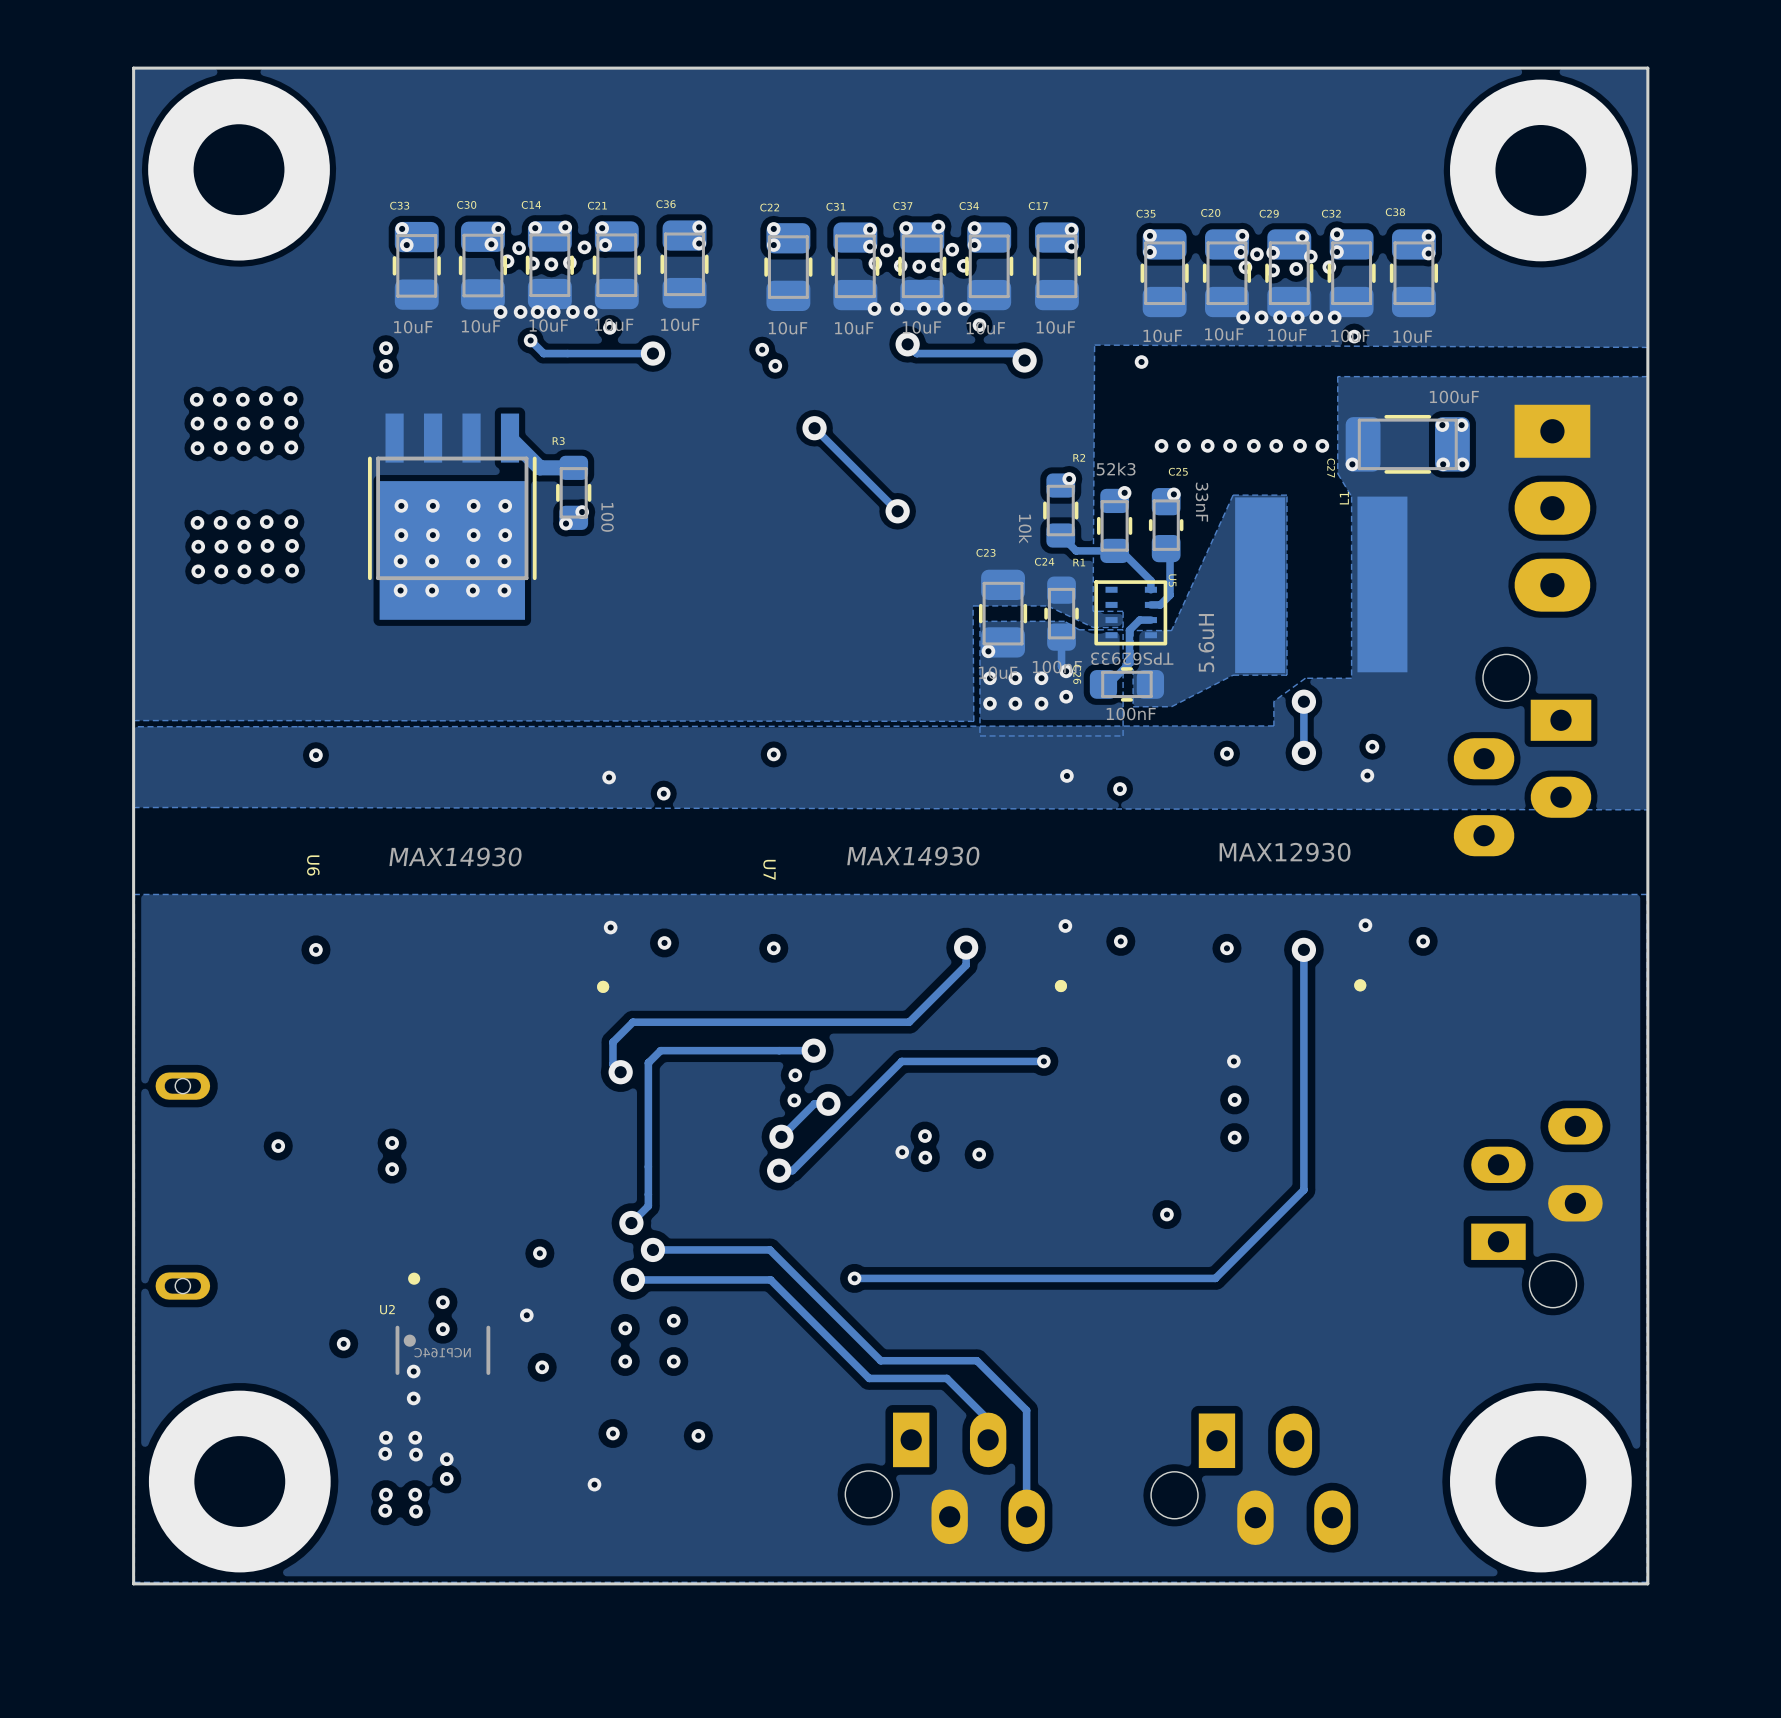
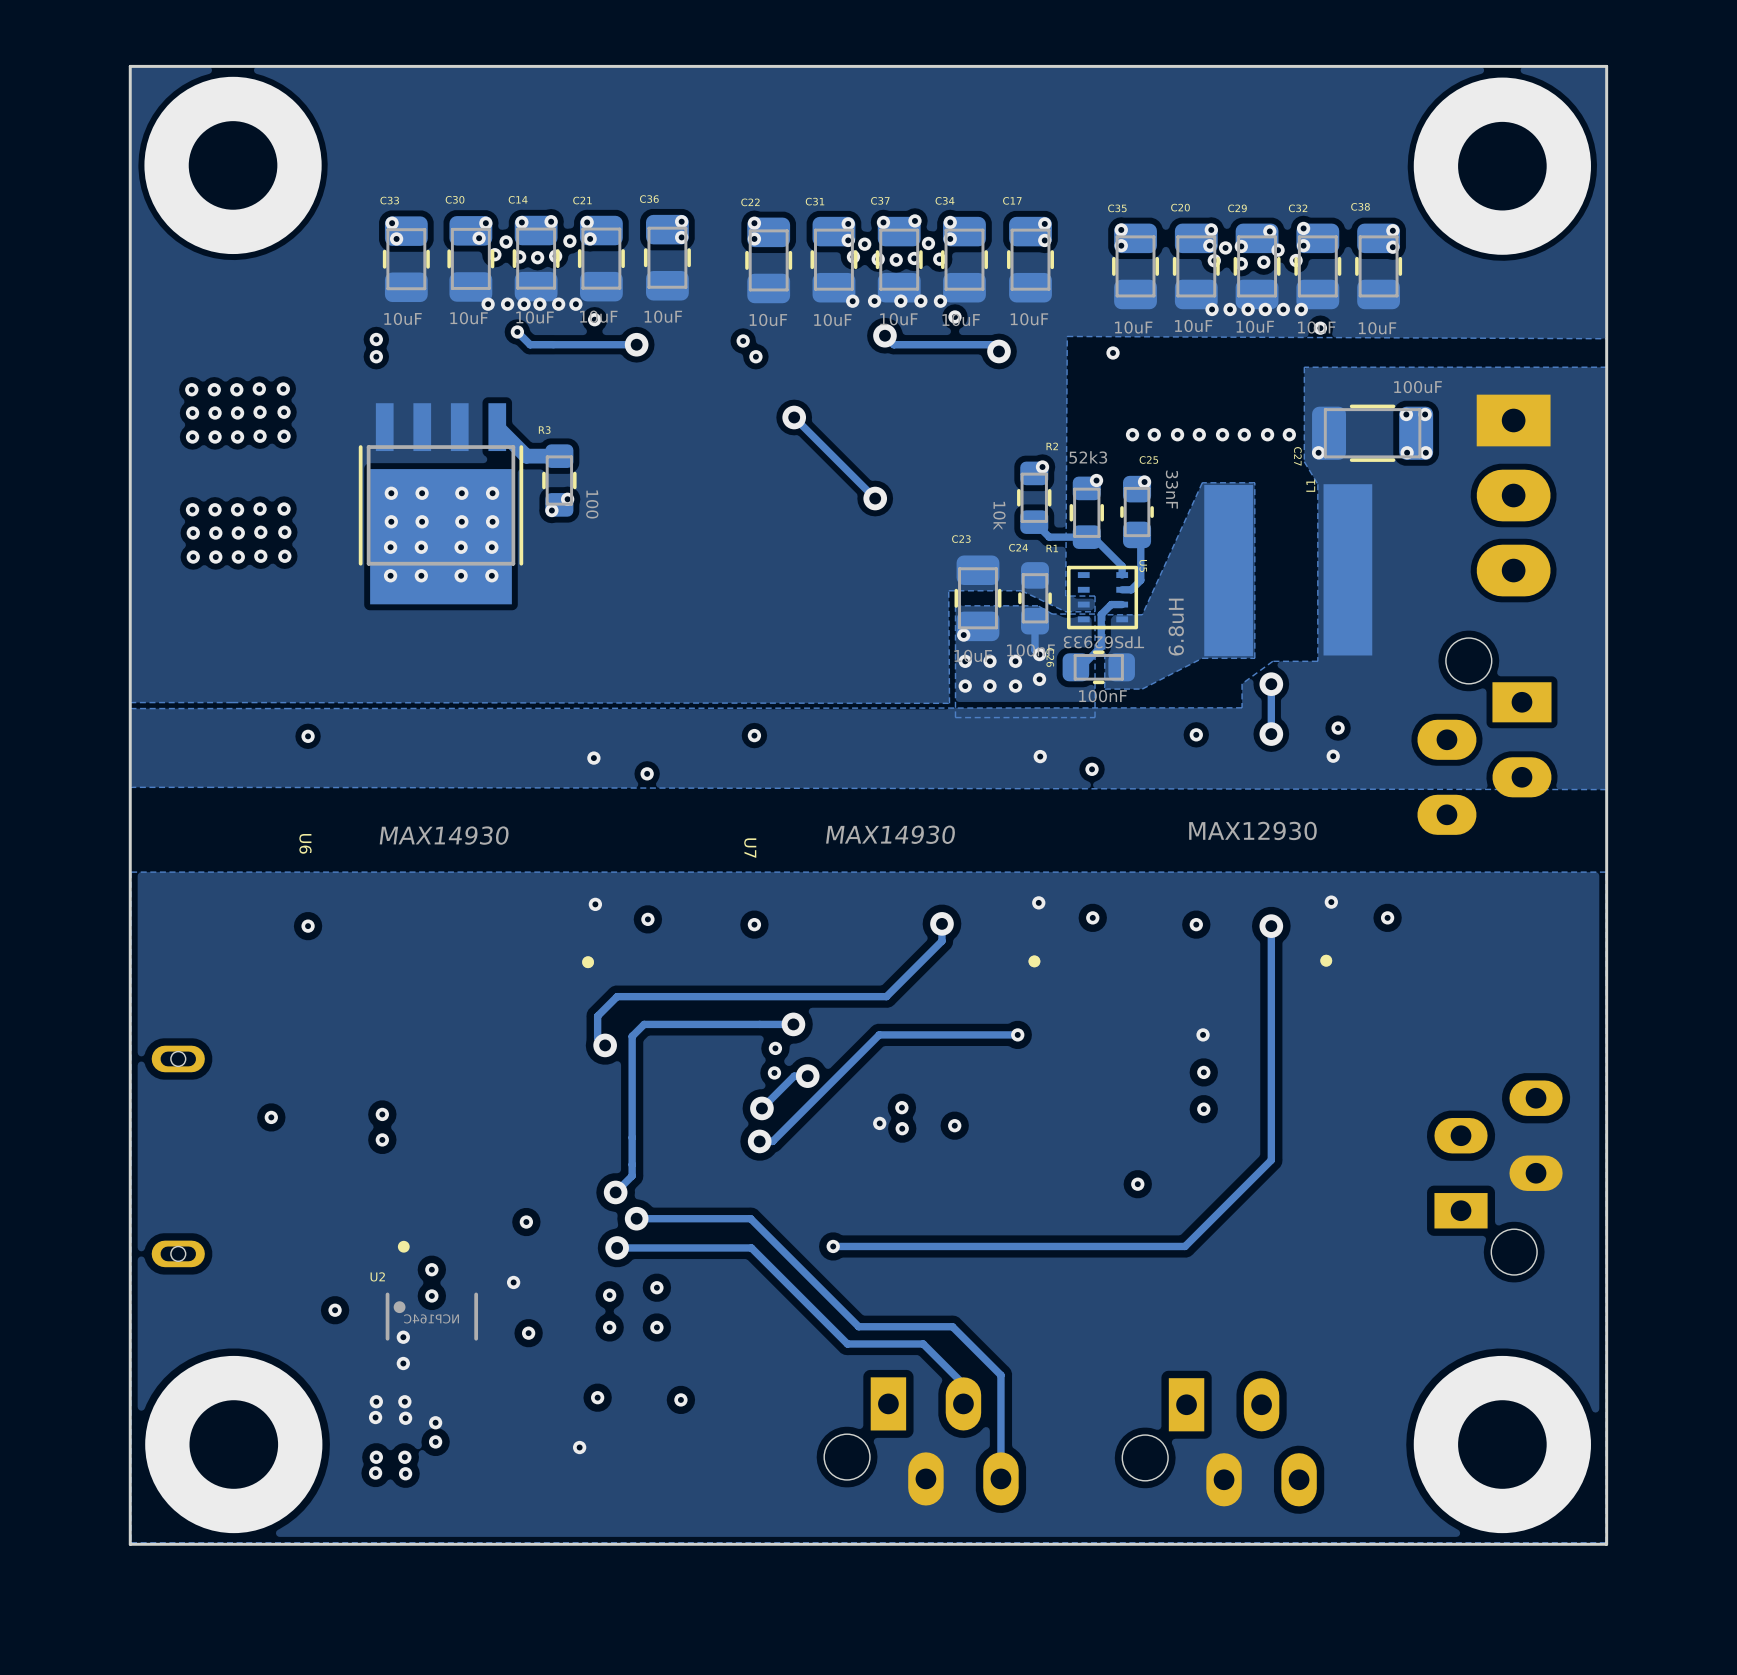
L1 value: 5.6uH (1206, 643) -> 6.8uH (1176, 627)

